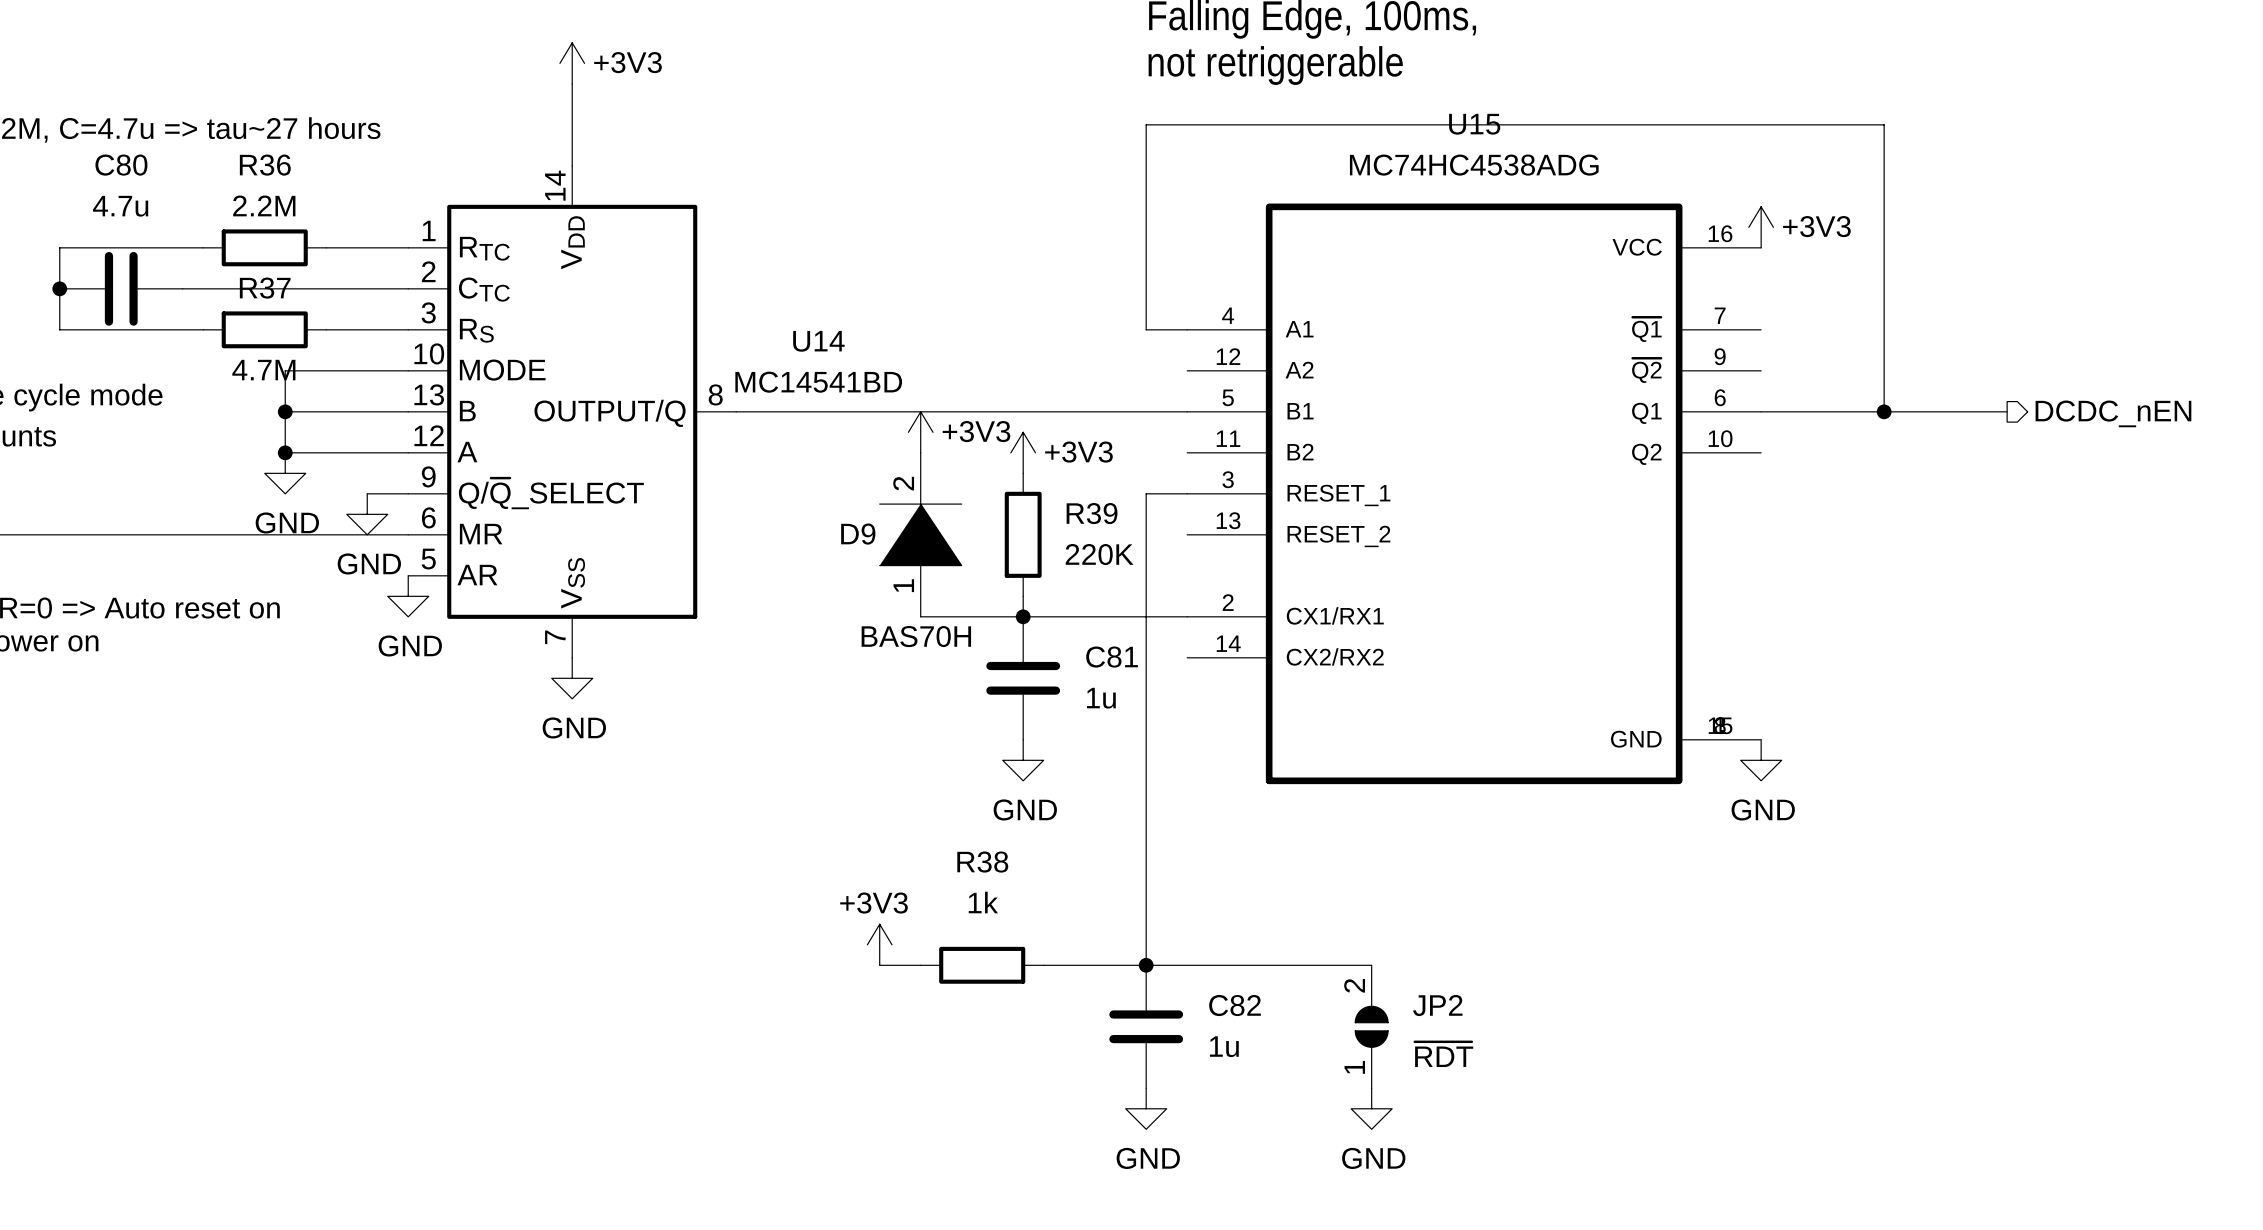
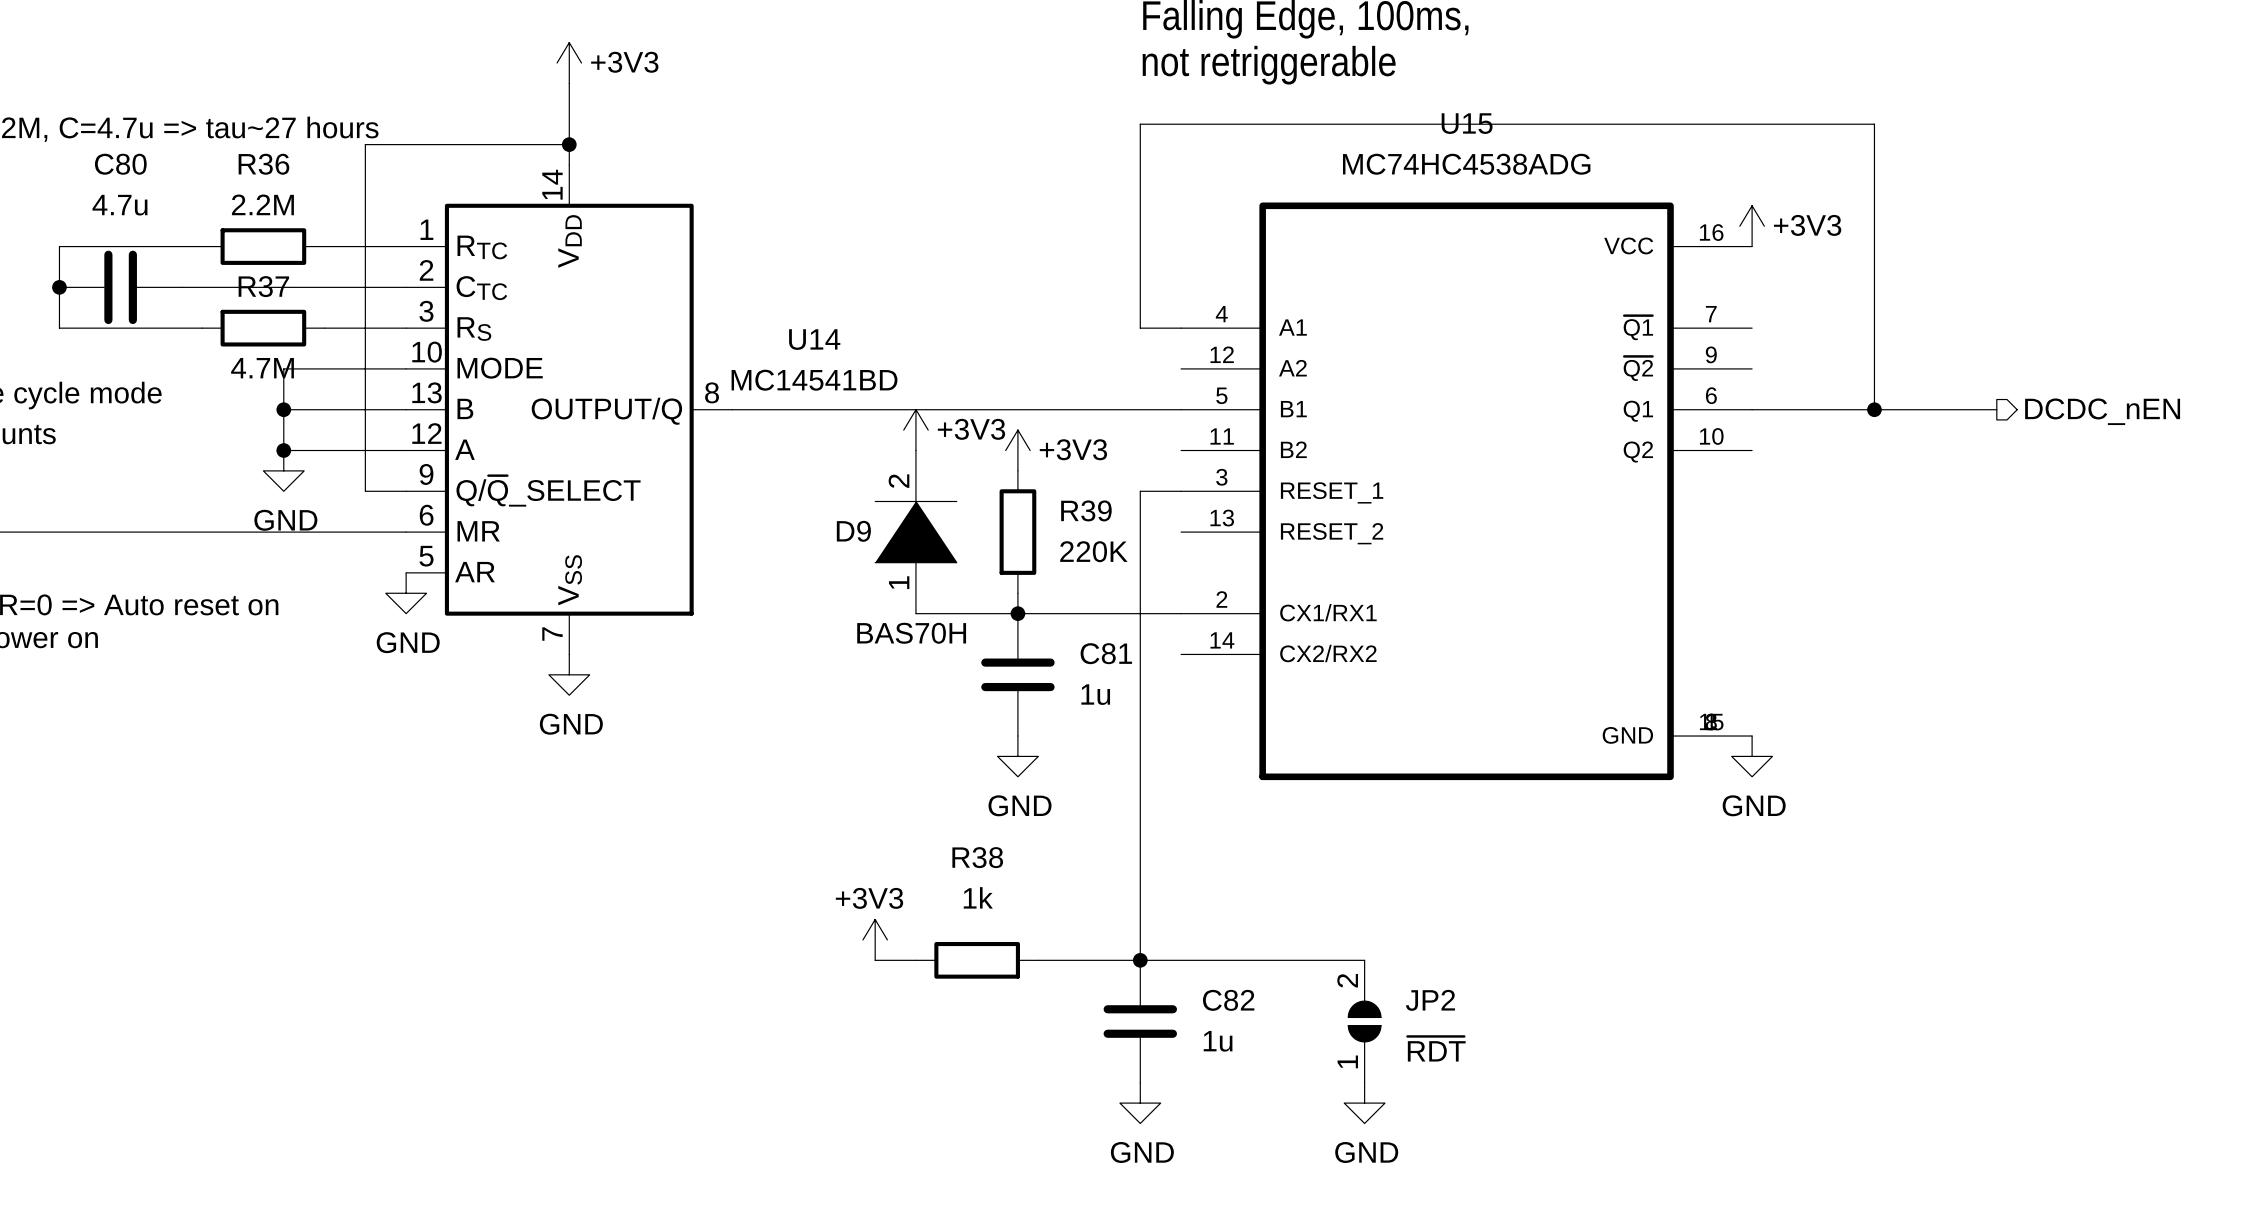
wire: none -> (569, 144) (365, 144) (365, 491)
junction: none -> (569, 144)
power symbol: GND (367, 514) -> none

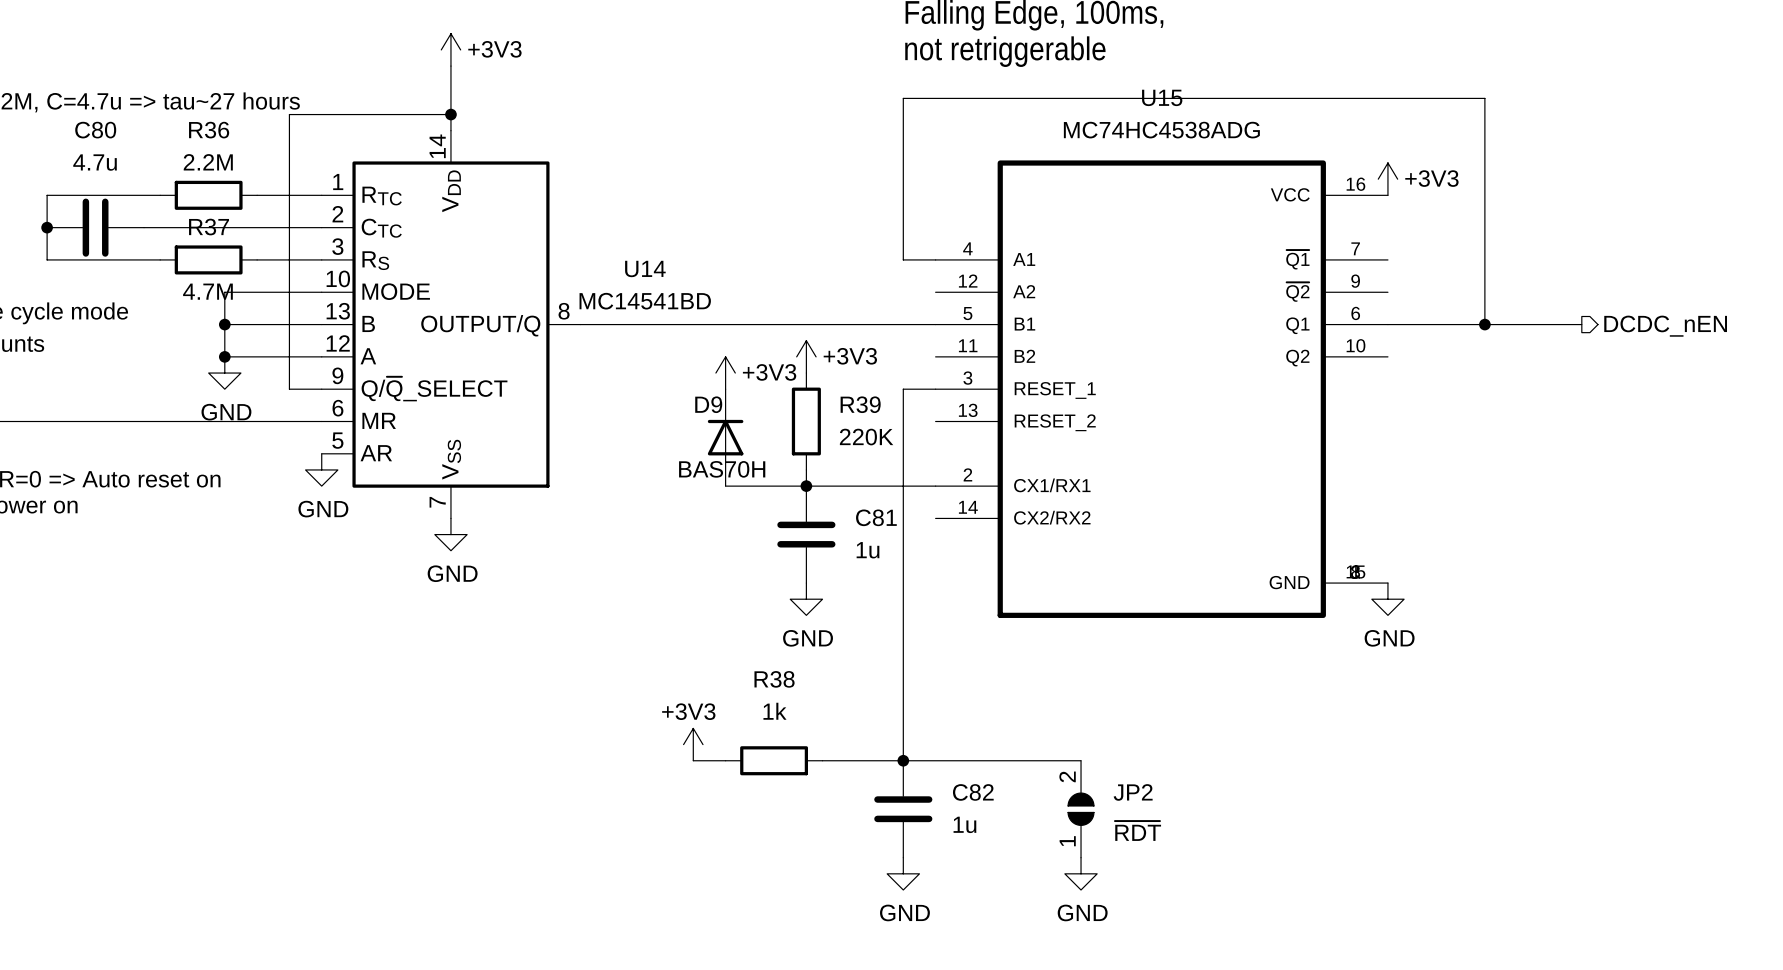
power symbol position: +3V3 (915, 430) -> +3V3 (725, 373)
D9 symbol: [875, 450, 957, 614] -> [707, 389, 744, 487]
D9 name position: D9 (853, 531) -> D9 (708, 404)
D9 value position: BAS70H (911, 633) -> BAS70H (722, 469)

